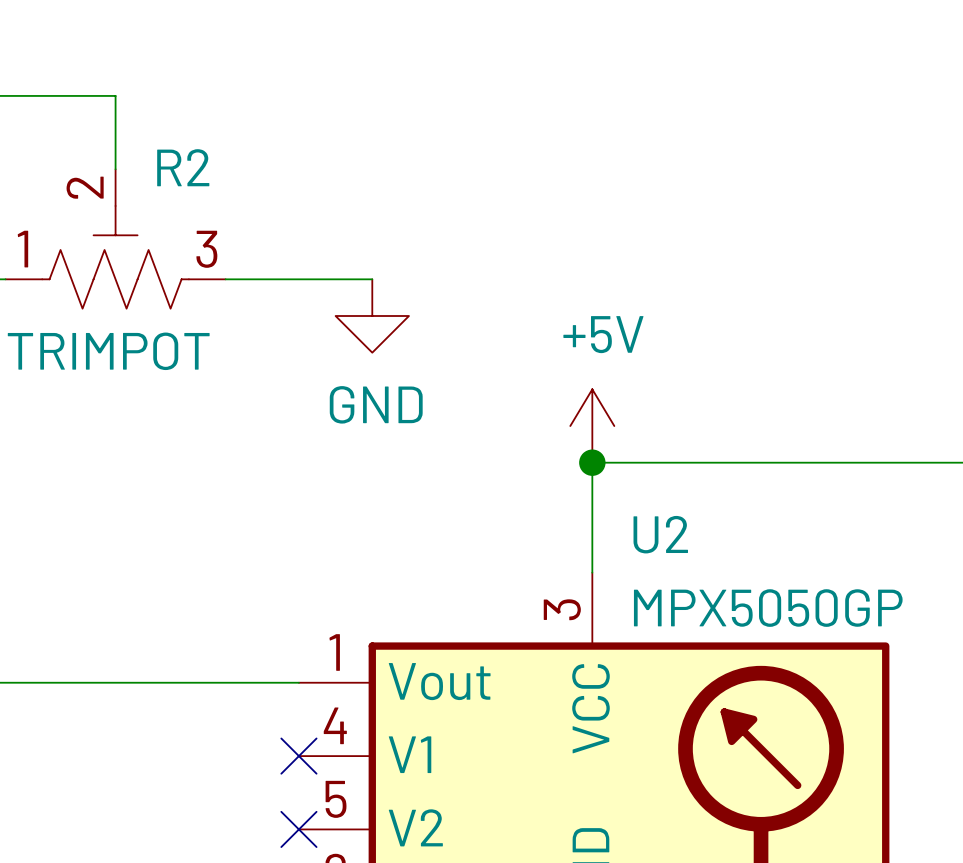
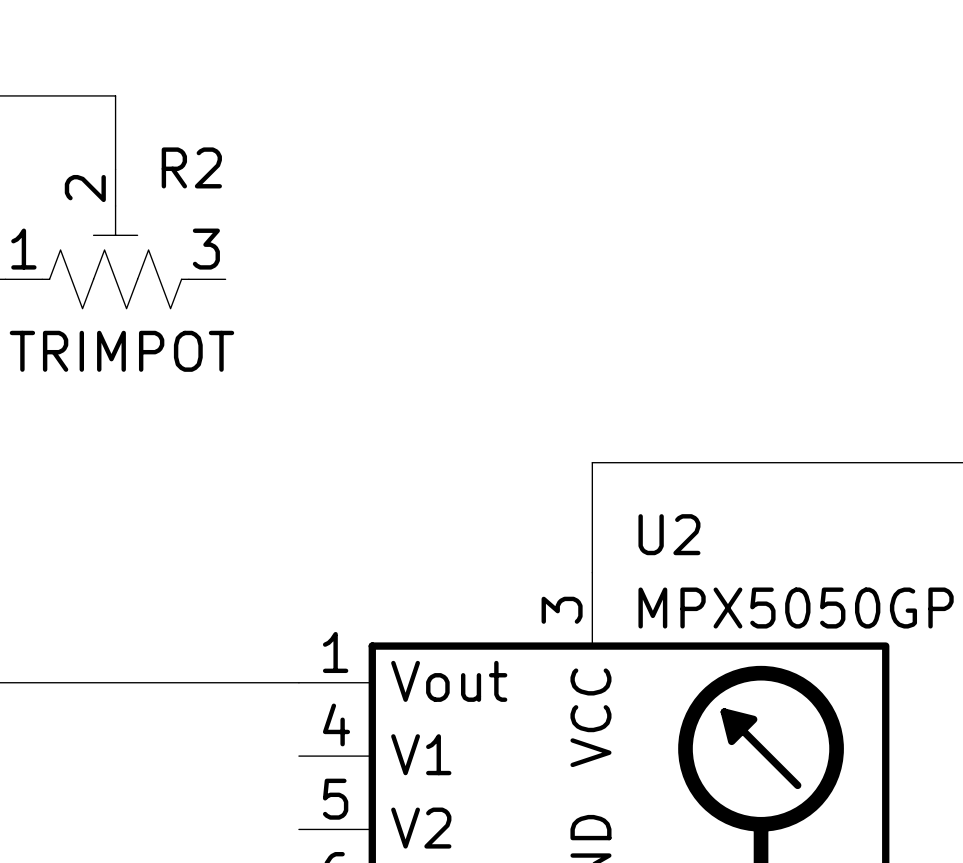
wire: (225, 279) (372, 279) -> none
power symbol: GND (372, 316) -> none
power symbol: +5V (592, 426) -> none
junction: (592, 462) -> none
no-connect mark: (298, 756) -> none
no-connect mark: (298, 829) -> none

